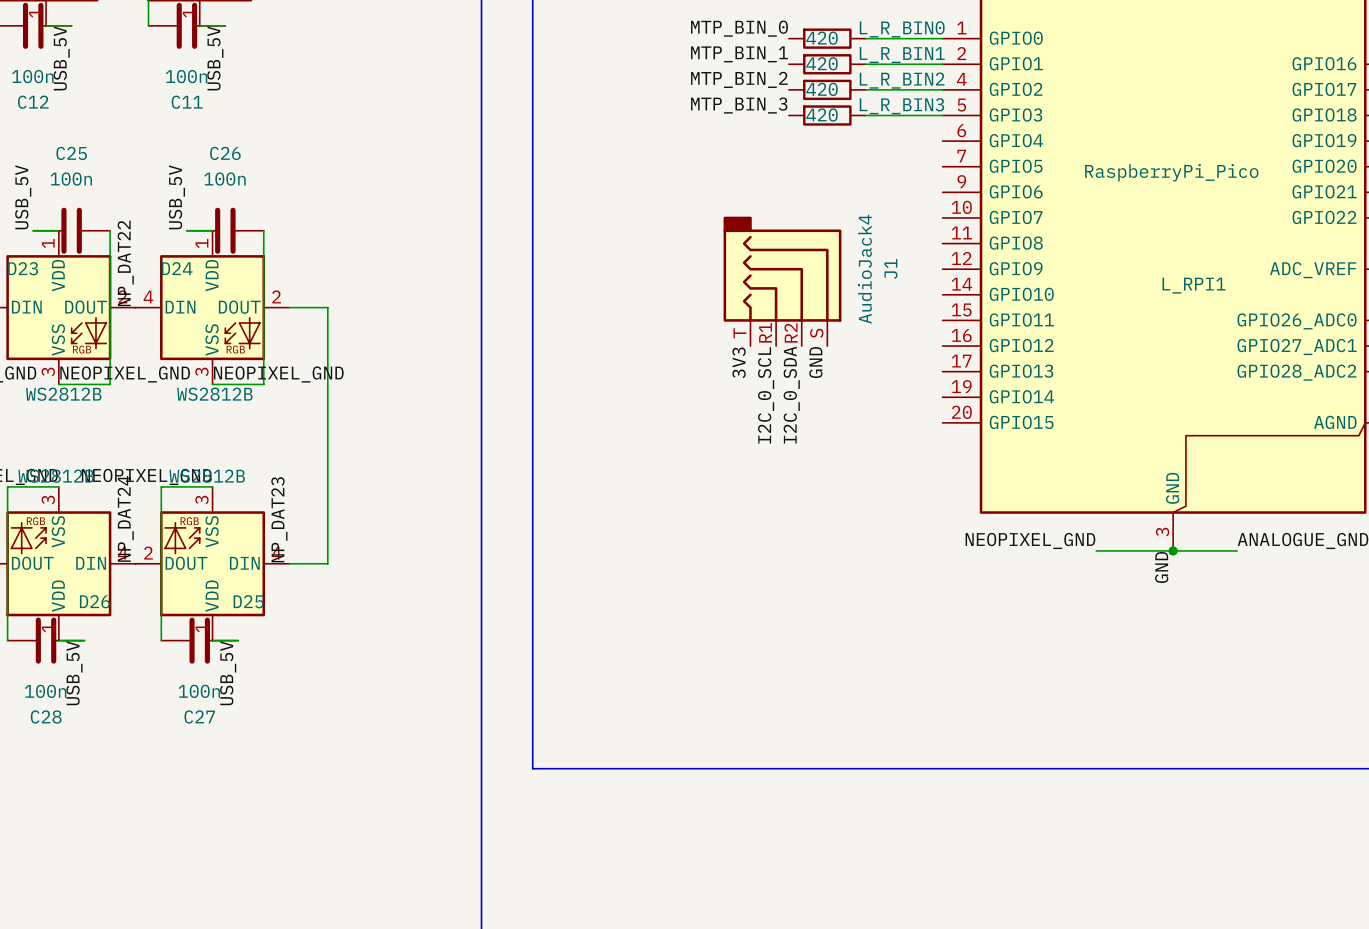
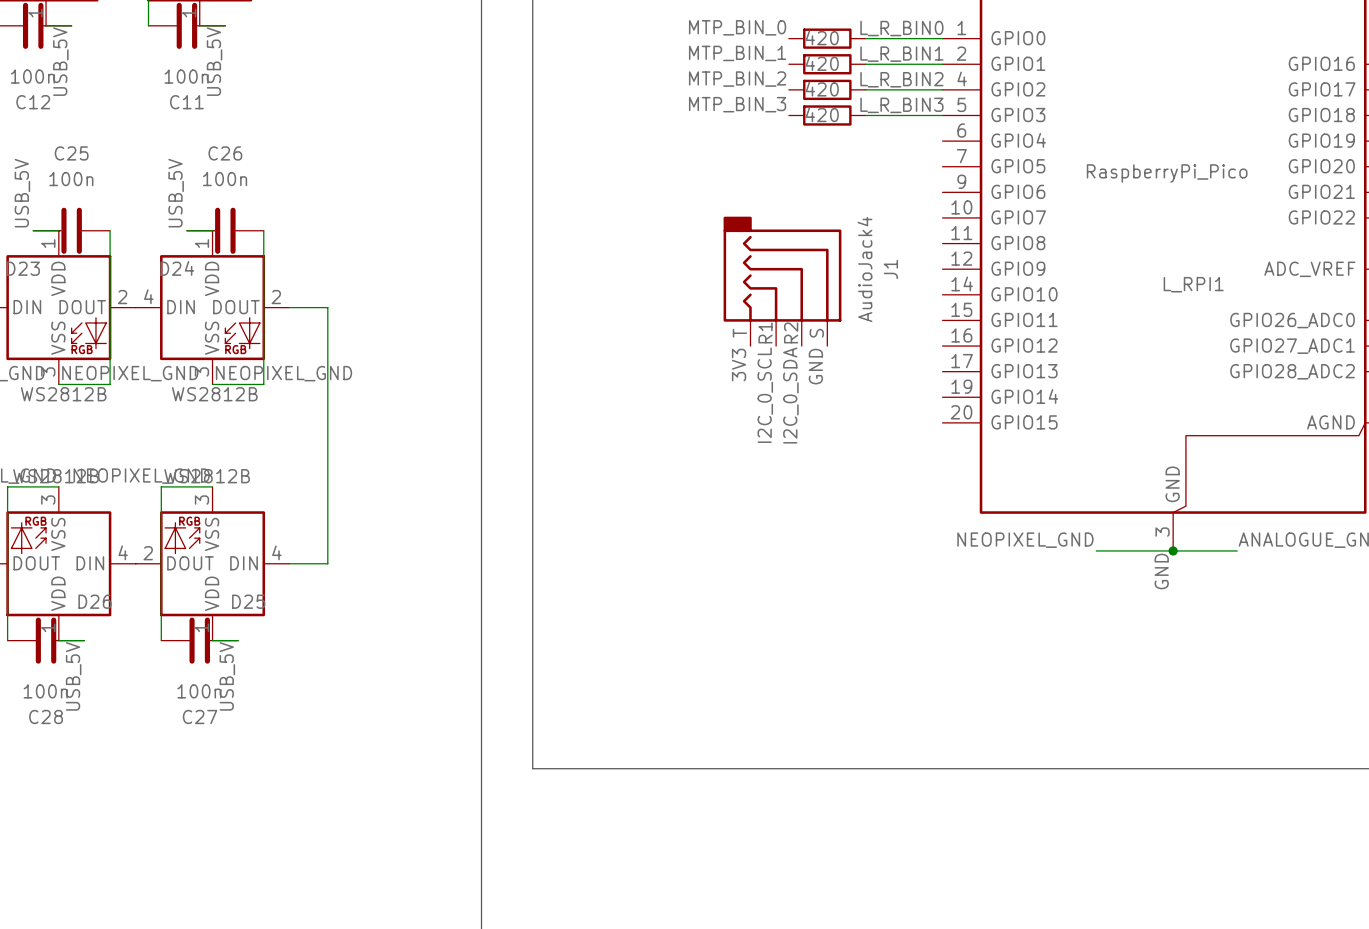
label: NP_DAT22 (125, 263) -> none
label: NP_DAT24 (125, 518) -> none
label: NP_DAT23 (279, 519) -> none

